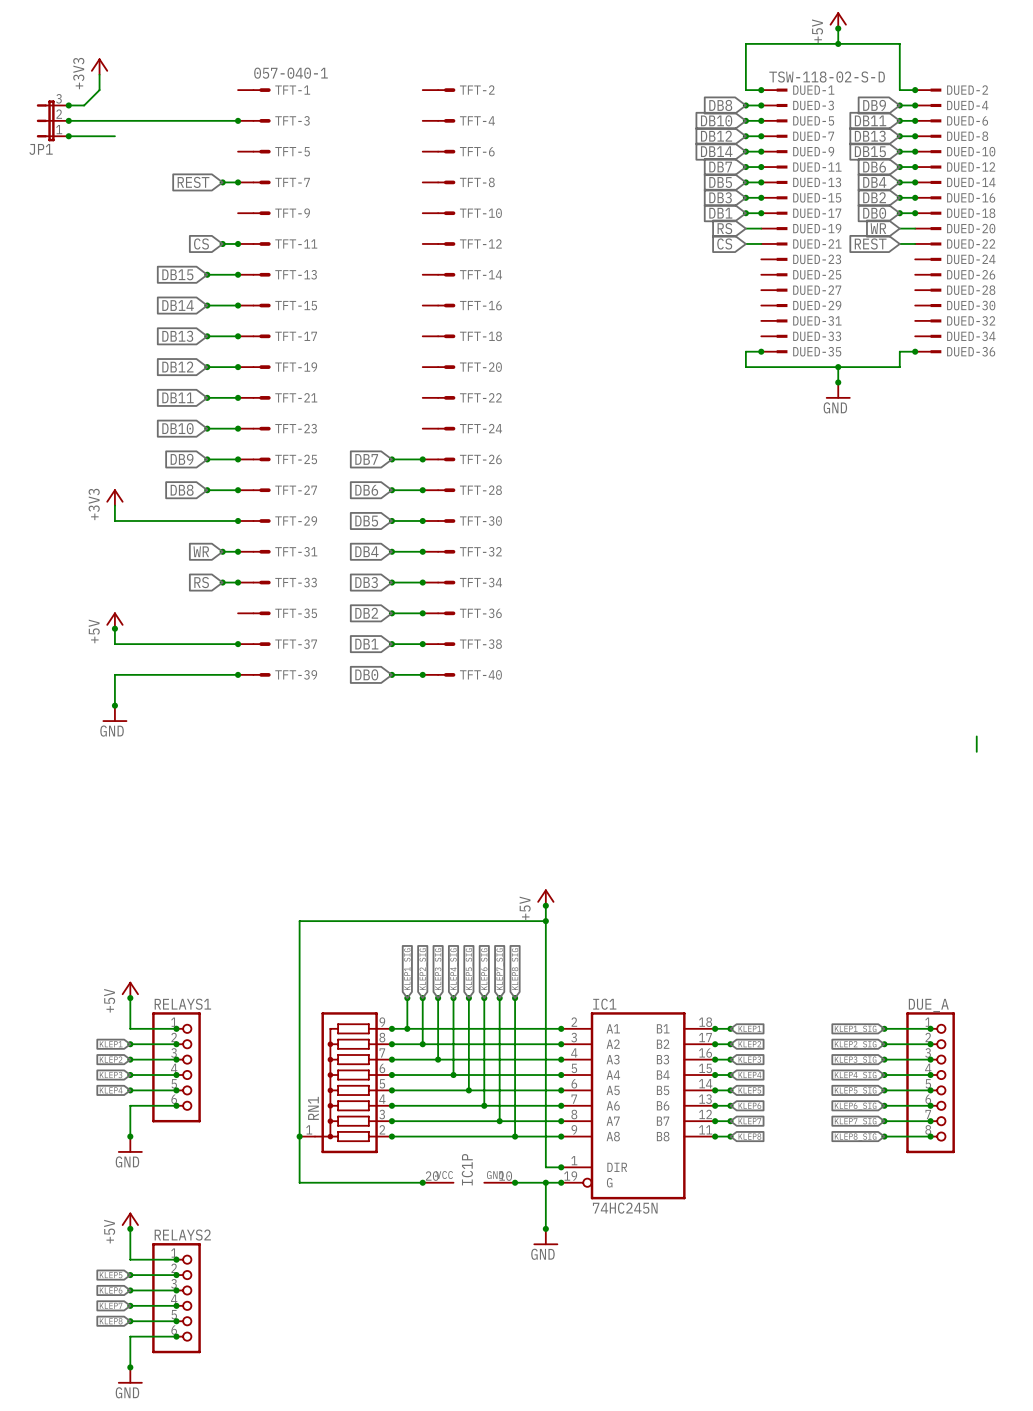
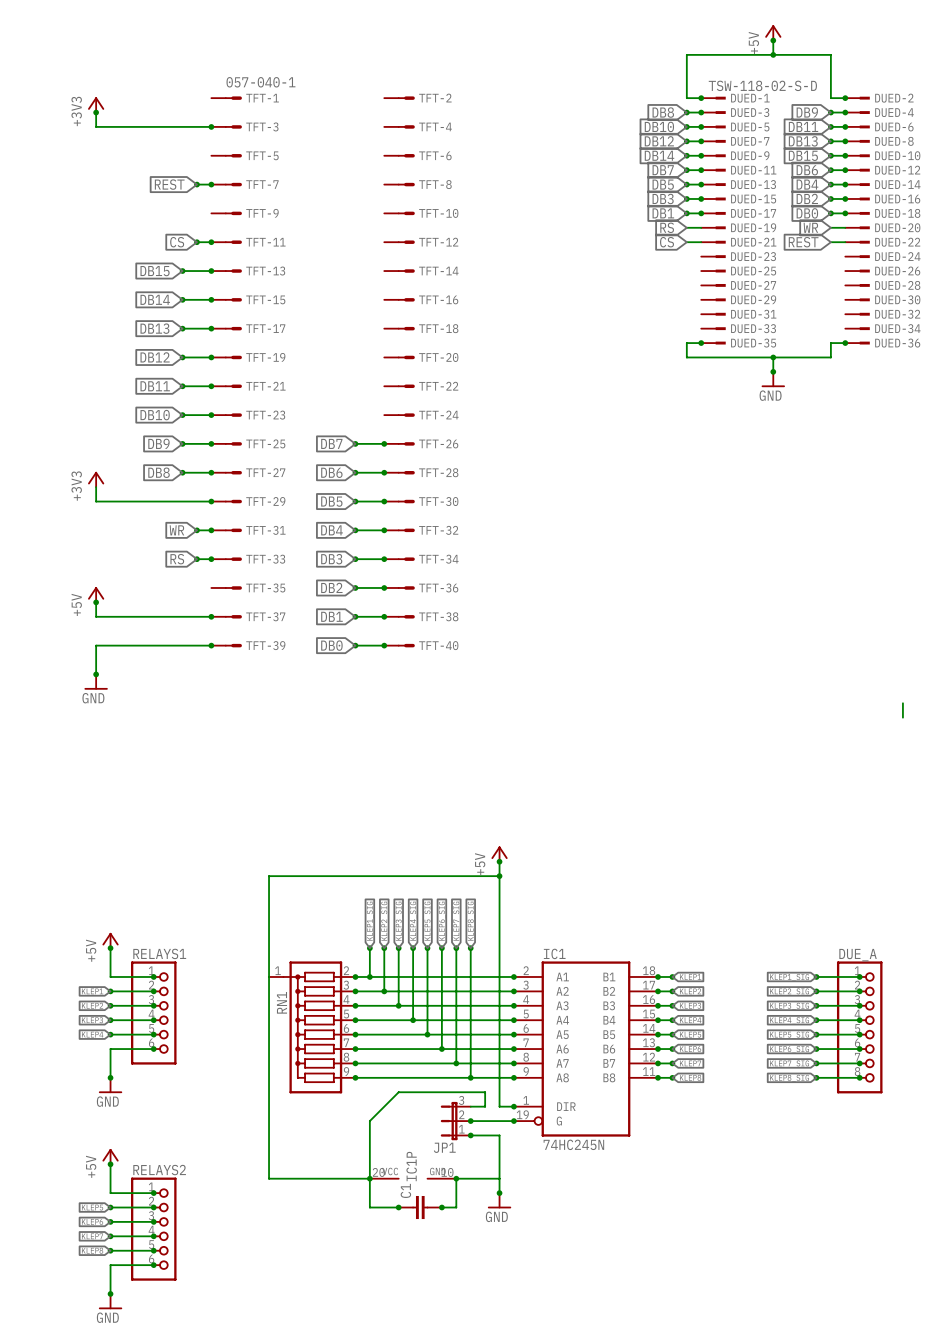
power symbol position: +3V3 (99, 66) -> +3V3 (96, 104)
wire: (99, 74) (99, 90) (84, 105) (68, 105) -> none
junction: (68, 105) -> none
junction: none -> (96, 112)
JP1 position: (52, 120) -> (455, 1121)
wire: (68, 120) (114, 120) -> (96, 112) (96, 126)
junction: (68, 120) -> none
wire: (68, 136) (114, 136) -> none
junction: (68, 136) -> none
RN1 flip: as is (346, 1082) -> up-down (312, 1027)
junction: (299, 1136) -> none
wire: none -> (470, 1106) (485, 1106) (485, 1092) (398, 1092) (369, 1121) (369, 1207) (398, 1207)
wire: (299, 1182) (422, 1182) -> (269, 1121) (269, 1178) (369, 1178)
junction: (422, 1182) -> none
IC1P position: (468, 1182) -> (413, 1178)
wire: (545, 1182) (545, 1198) -> (470, 1135) (499, 1135)
junction: (545, 1182) -> none
junction: none -> (470, 1135)
junction: (545, 1228) -> none
power symbol position: GND (545, 1236) -> GND (499, 1200)
junction: none -> (369, 1178)
junction: none -> (456, 1178)
wire: none -> (499, 1178) (456, 1178) (456, 1207) (441, 1207)
junction: none -> (499, 1193)
junction: none -> (398, 1207)
C1: none -> (420, 1207)
junction: none -> (441, 1207)

